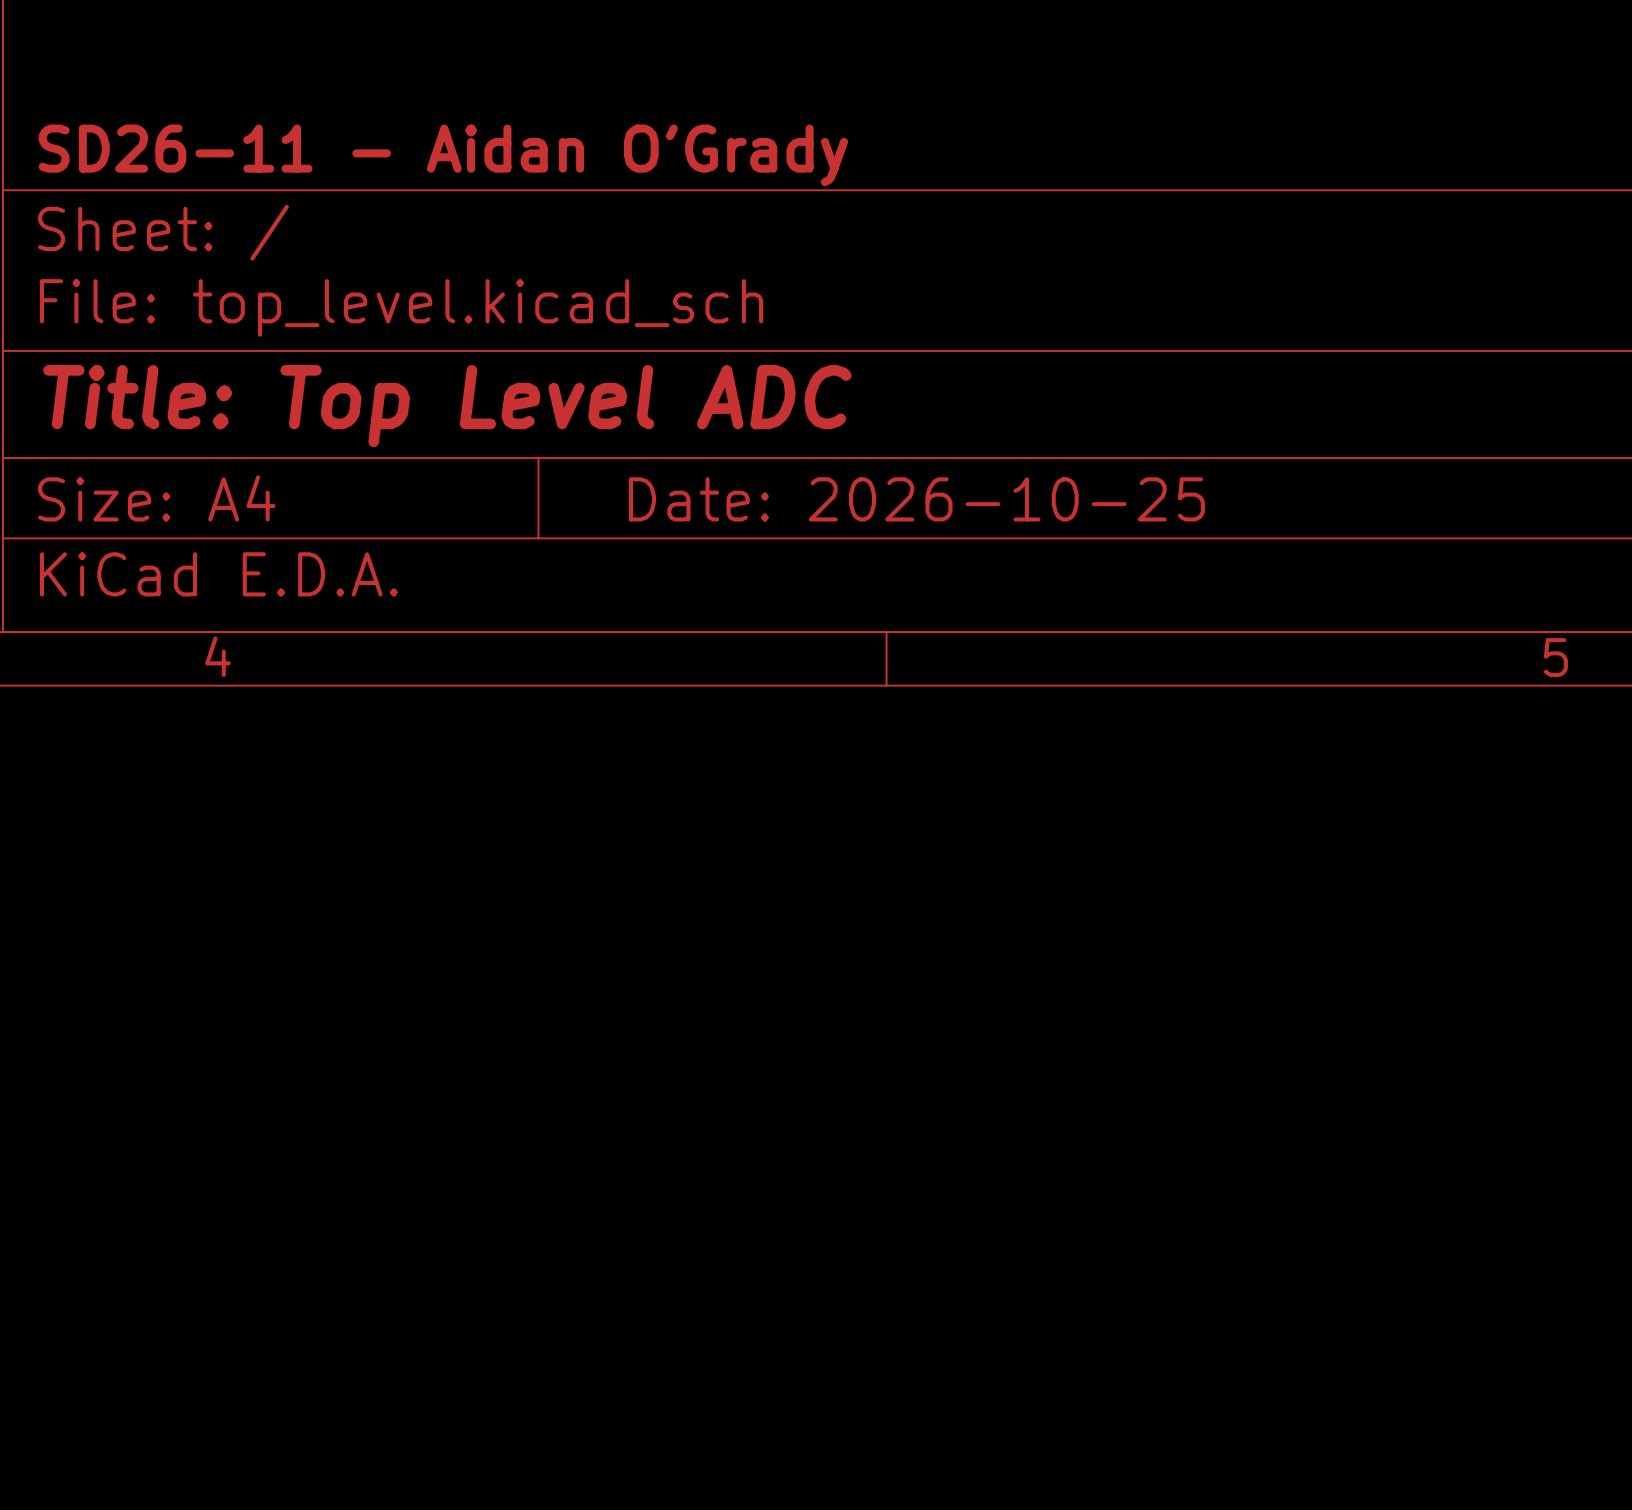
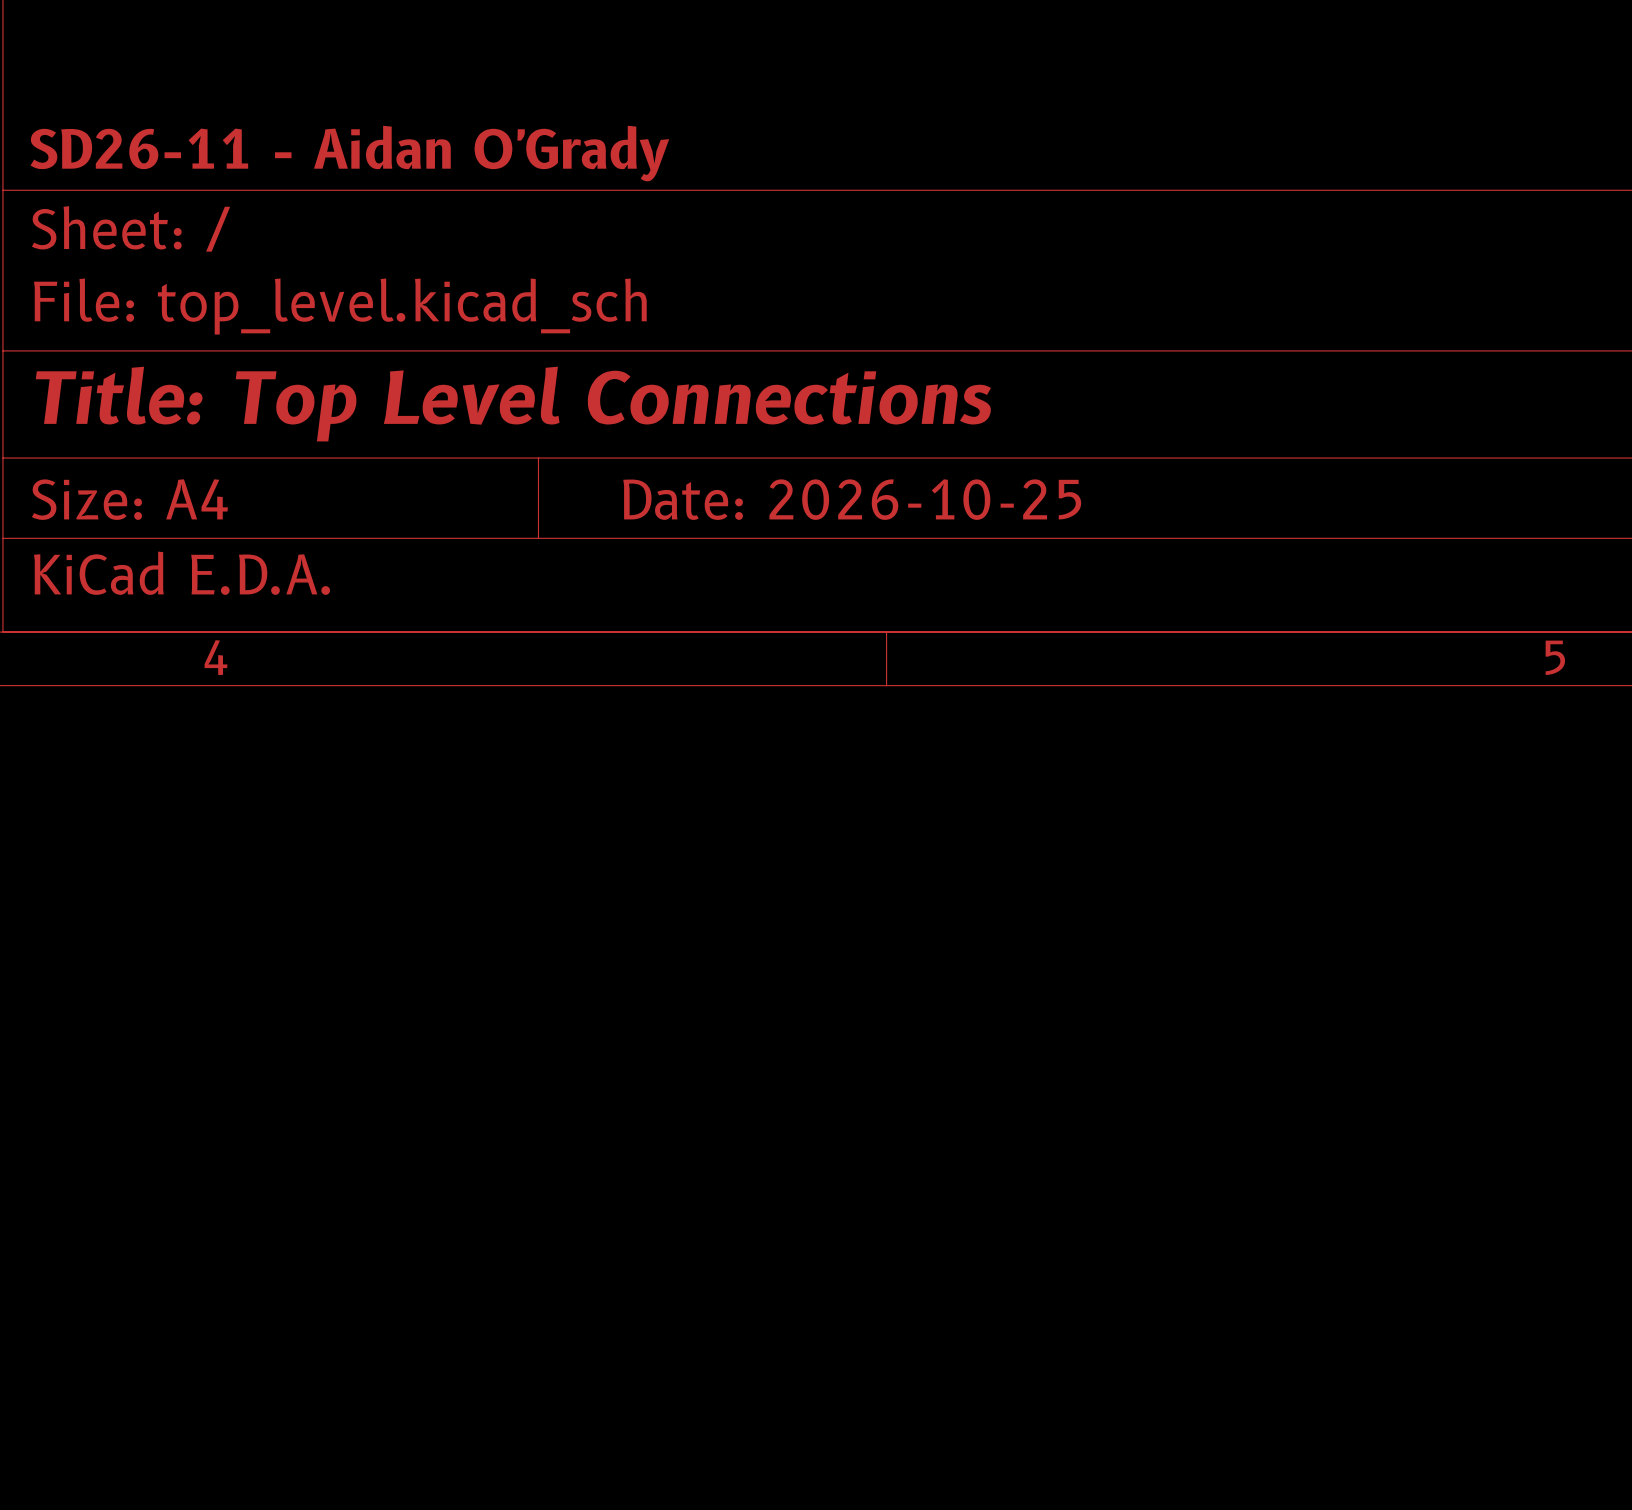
title block: Title: Top Level ADC (447, 406) -> Title: Top Level Connections (513, 404)

